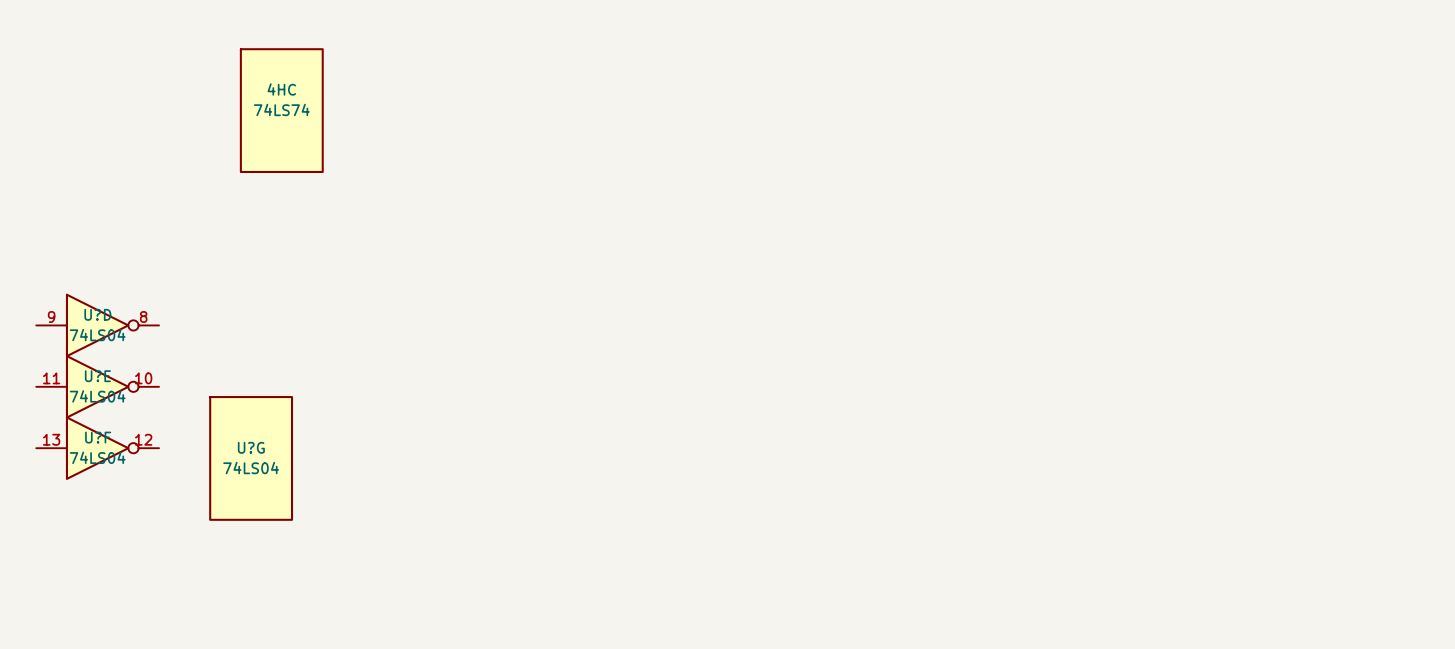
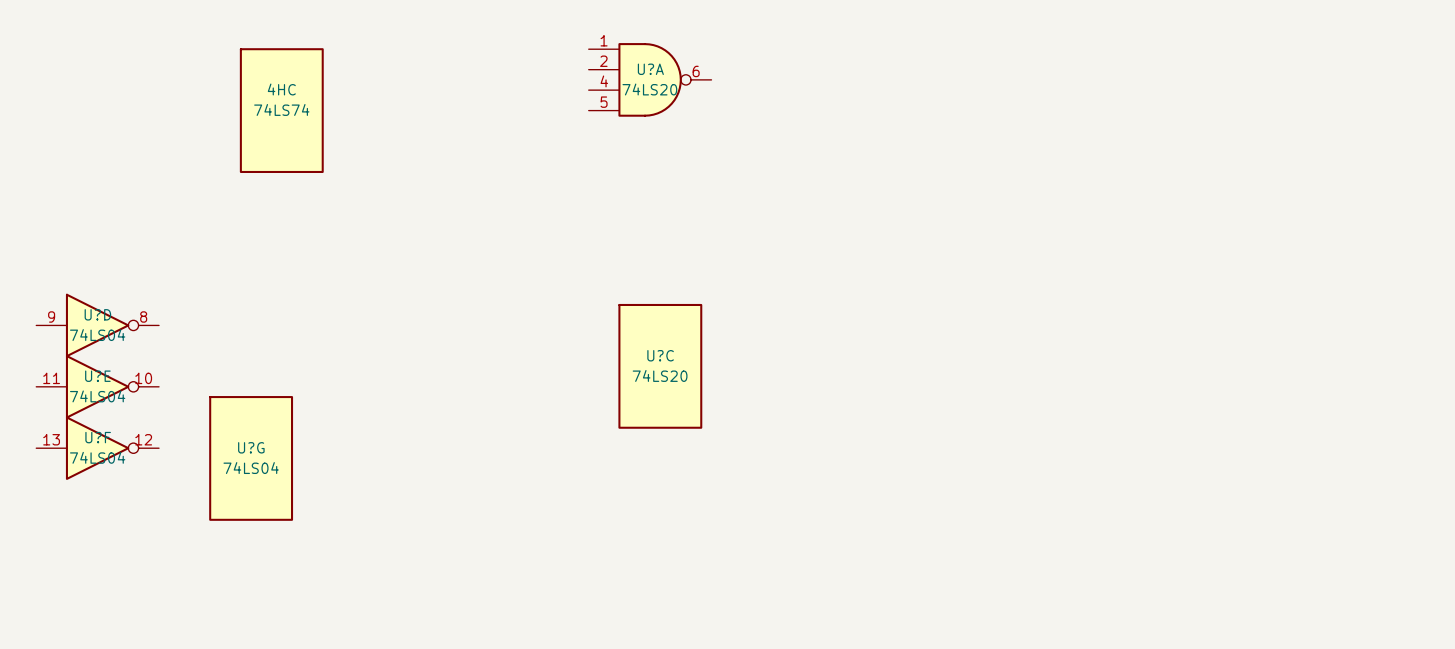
U?A: none -> 74LS20 (650, 79)
U?C: none -> 74LS20 (660, 366)

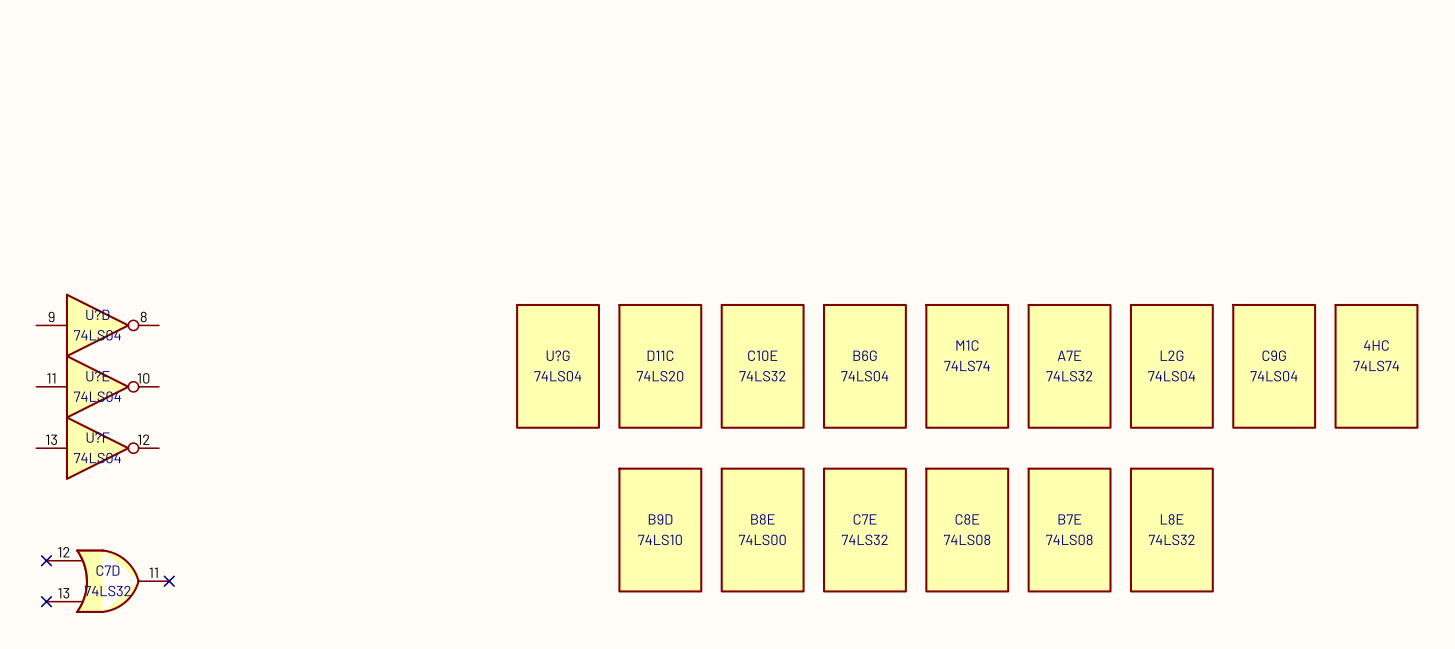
U?A: 74LS20 (650, 79) -> none
4HC position: (281, 110) -> (1376, 366)
U?C name: U?C (660, 355) -> D11C (660, 355)
U?G: none -> 74LS04 (558, 366)
C10E: none -> 74LS32 (762, 366)
B6G: none -> 74LS04 (864, 366)
M1C: none -> 74LS74 (967, 366)
A7E: none -> 74LS32 (1069, 366)
L2G: none -> 74LS04 (1171, 366)
C9G: none -> 74LS04 (1274, 366)
U?G: 74LS04 (251, 458) -> none
B9D: none -> 74LS10 (660, 530)
B8E: none -> 74LS00 (762, 530)
C7E: none -> 74LS32 (864, 530)
C8E: none -> 74LS08 (967, 530)
B7E: none -> 74LS08 (1069, 530)
L8E: none -> 74LS32 (1171, 530)
no-connect mark: none -> (46, 560)
C7D: none -> 74LS32 (107, 581)
no-connect mark: none -> (169, 581)
no-connect mark: none -> (46, 601)

